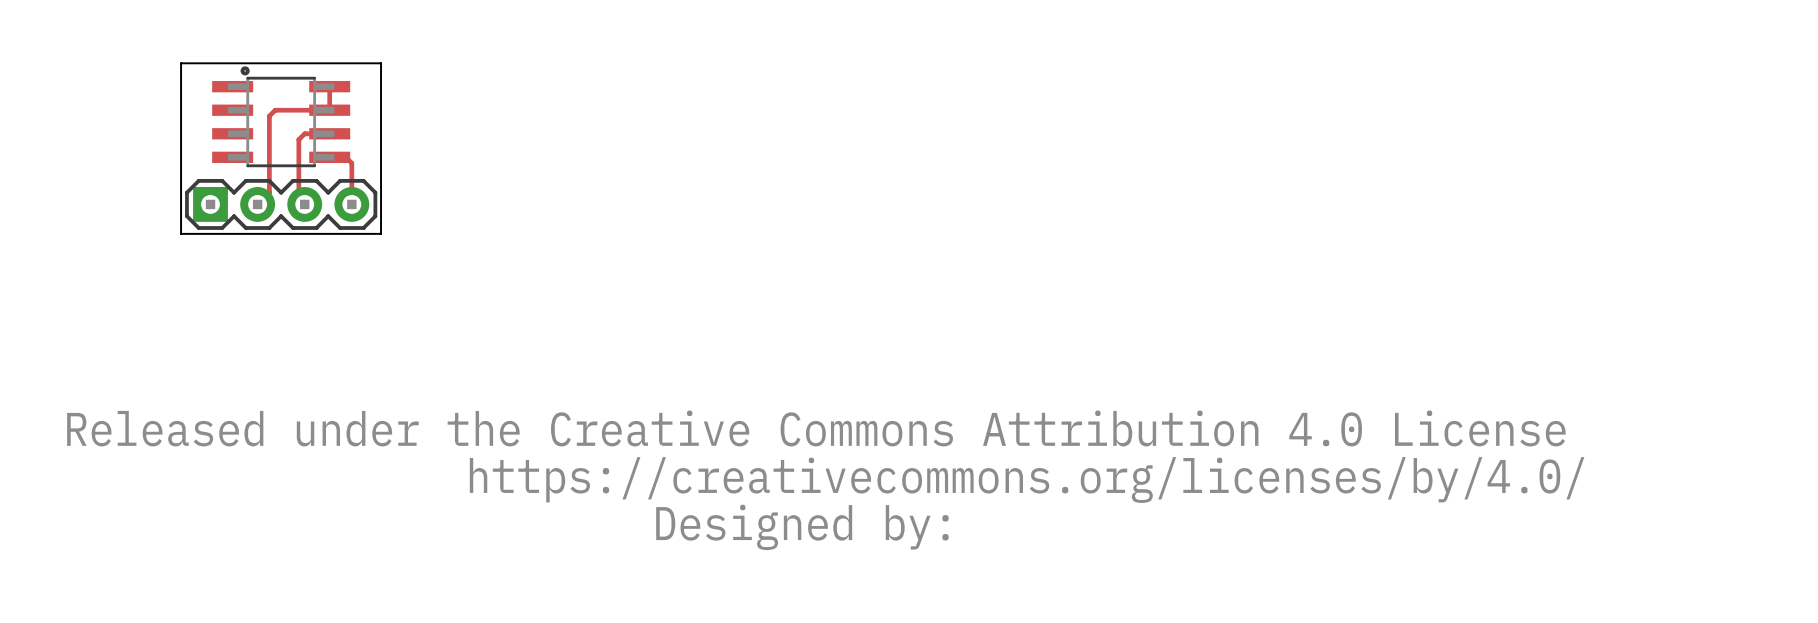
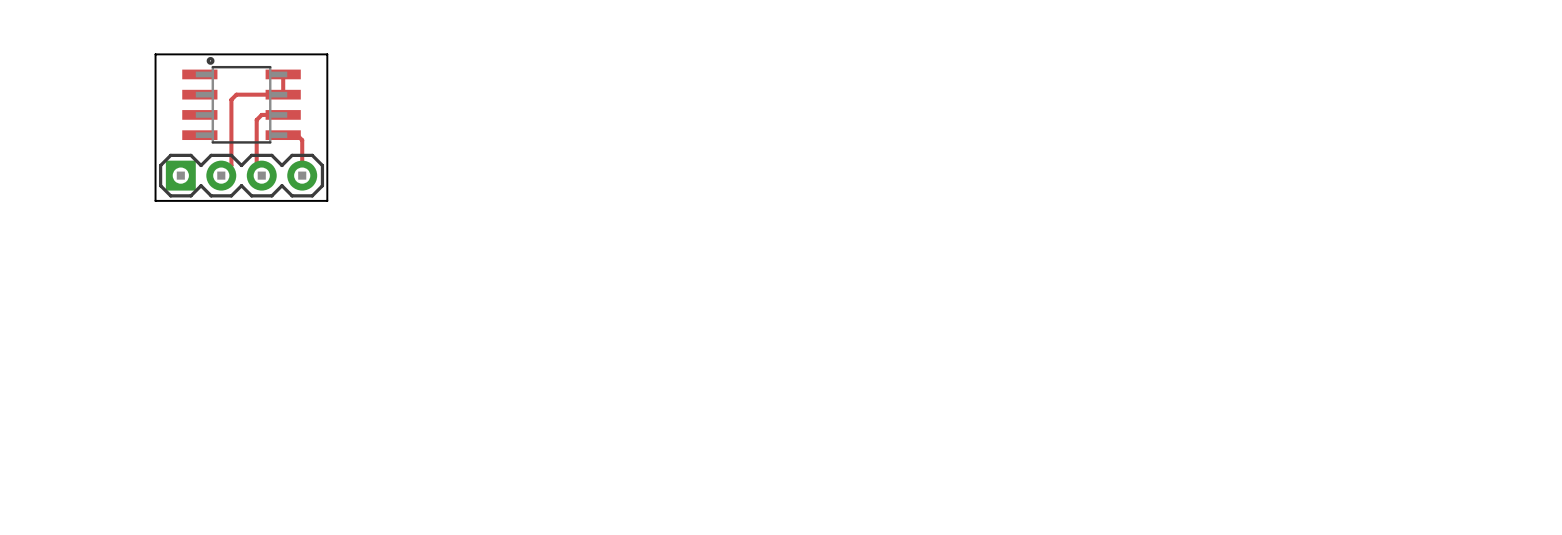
drawing: [67, 410, 1585, 551] -> none

